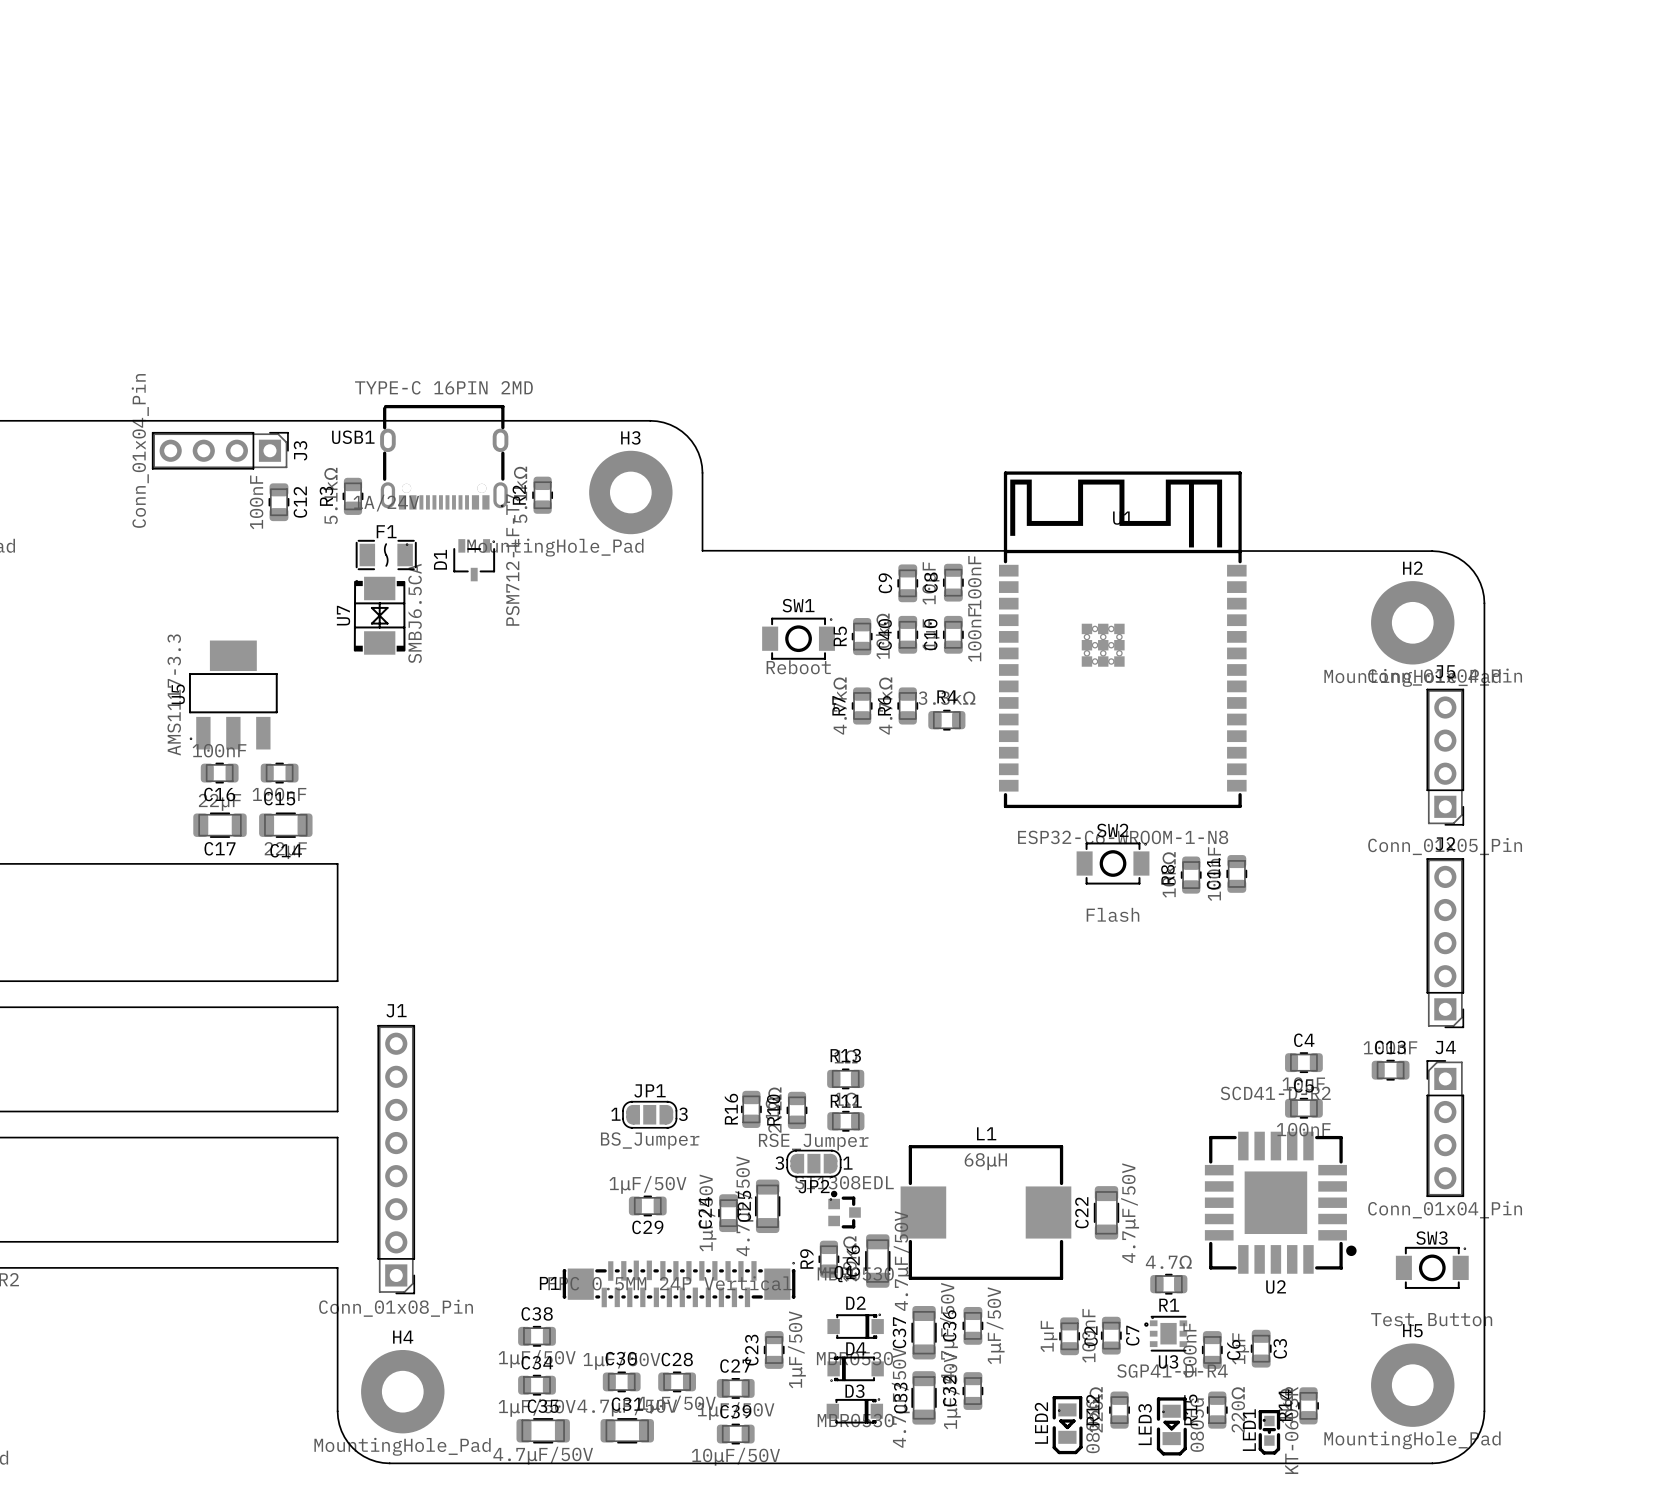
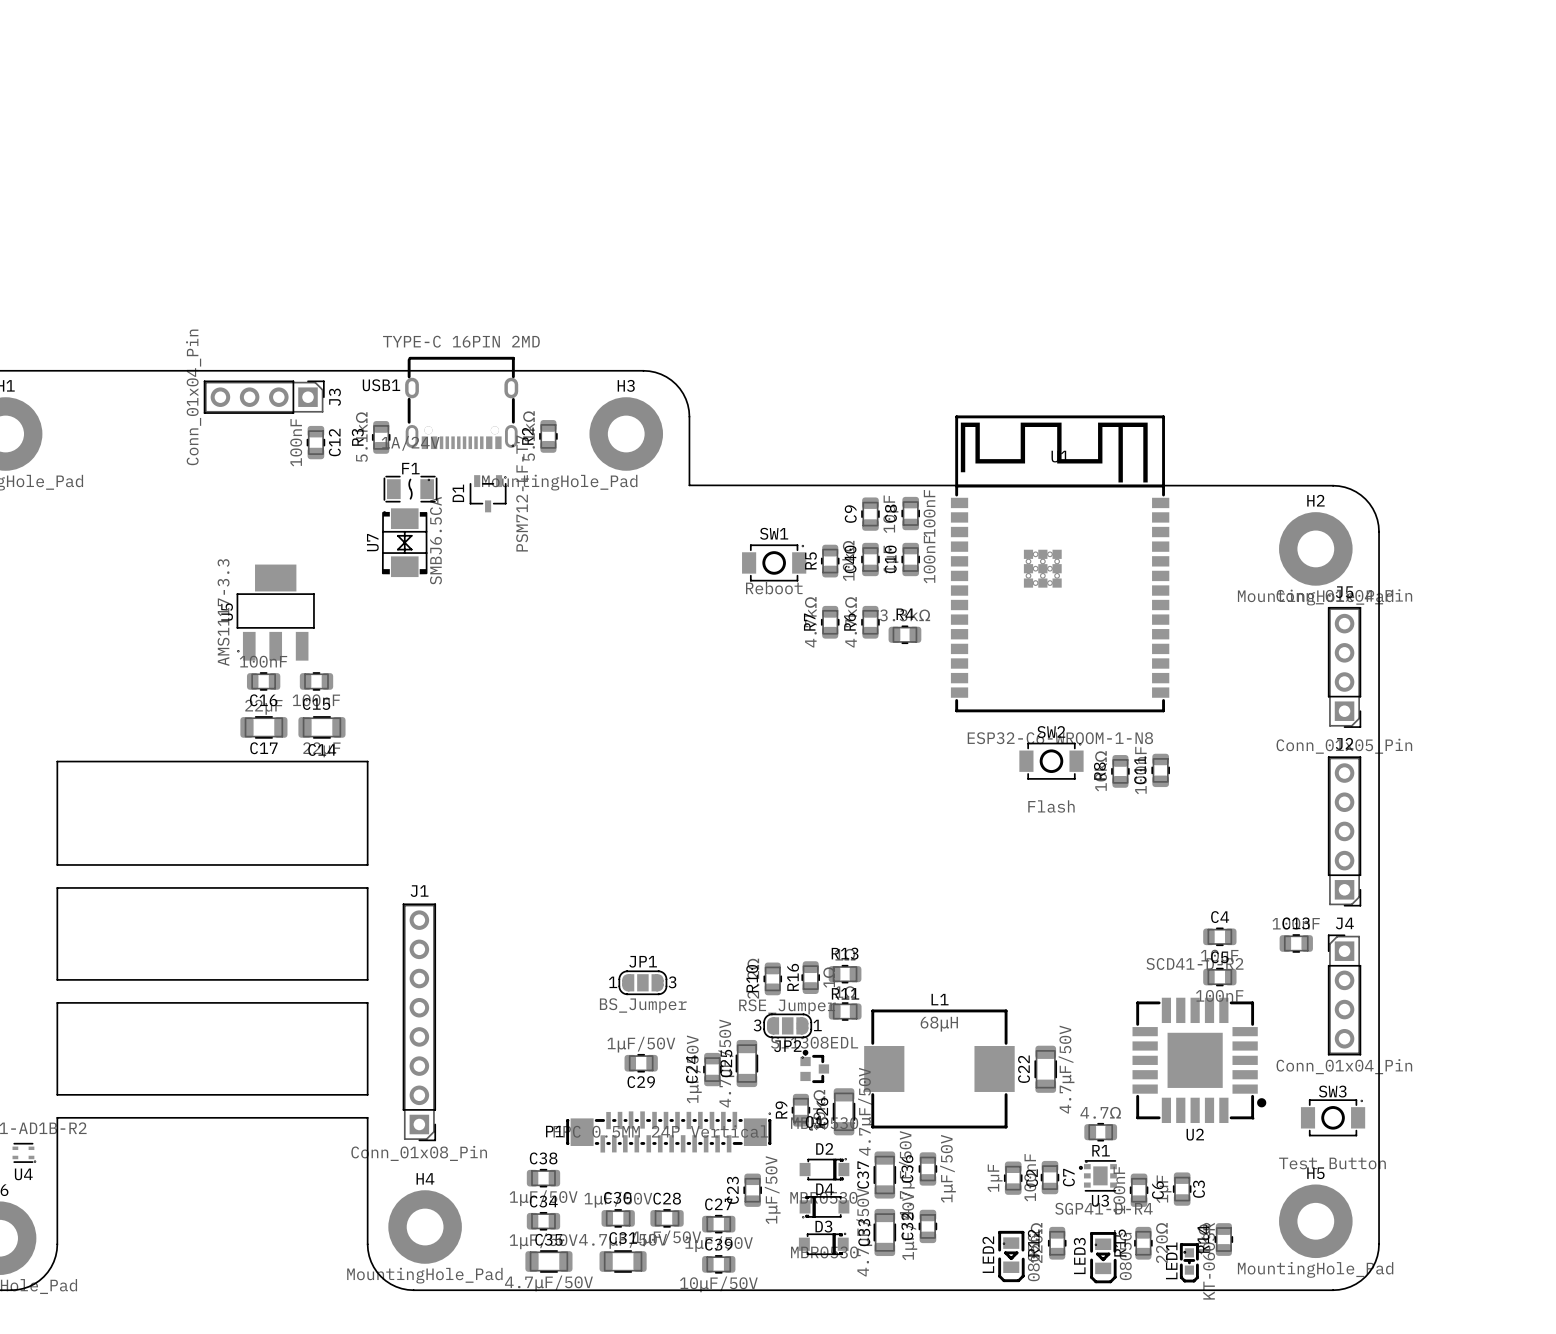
R13 position: (845, 1078) -> (845, 974)
R16 position: (751, 1109) -> (810, 977)
R11 position: (845, 1121) -> (845, 1011)

